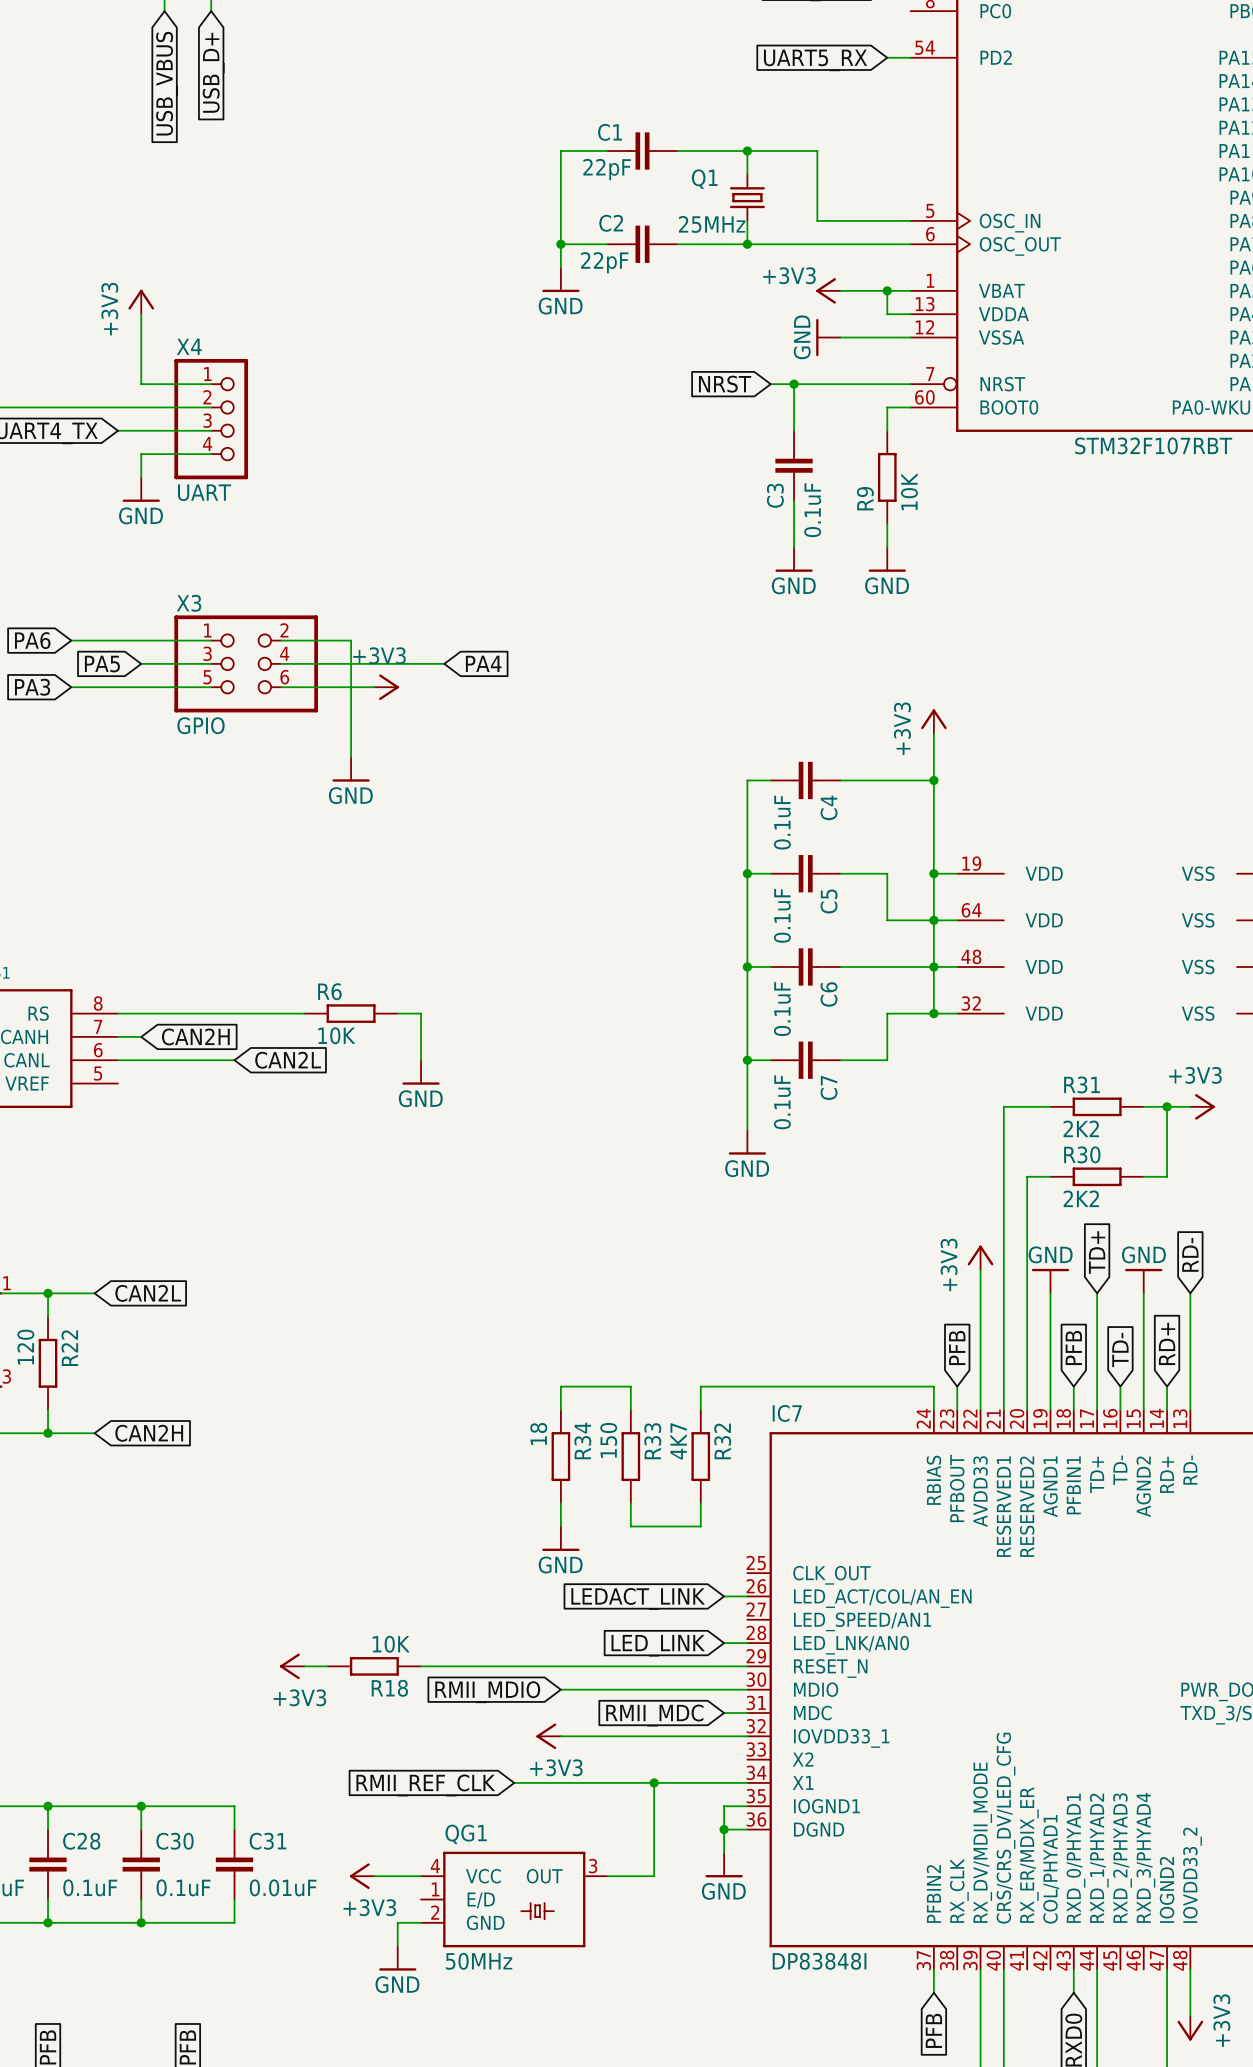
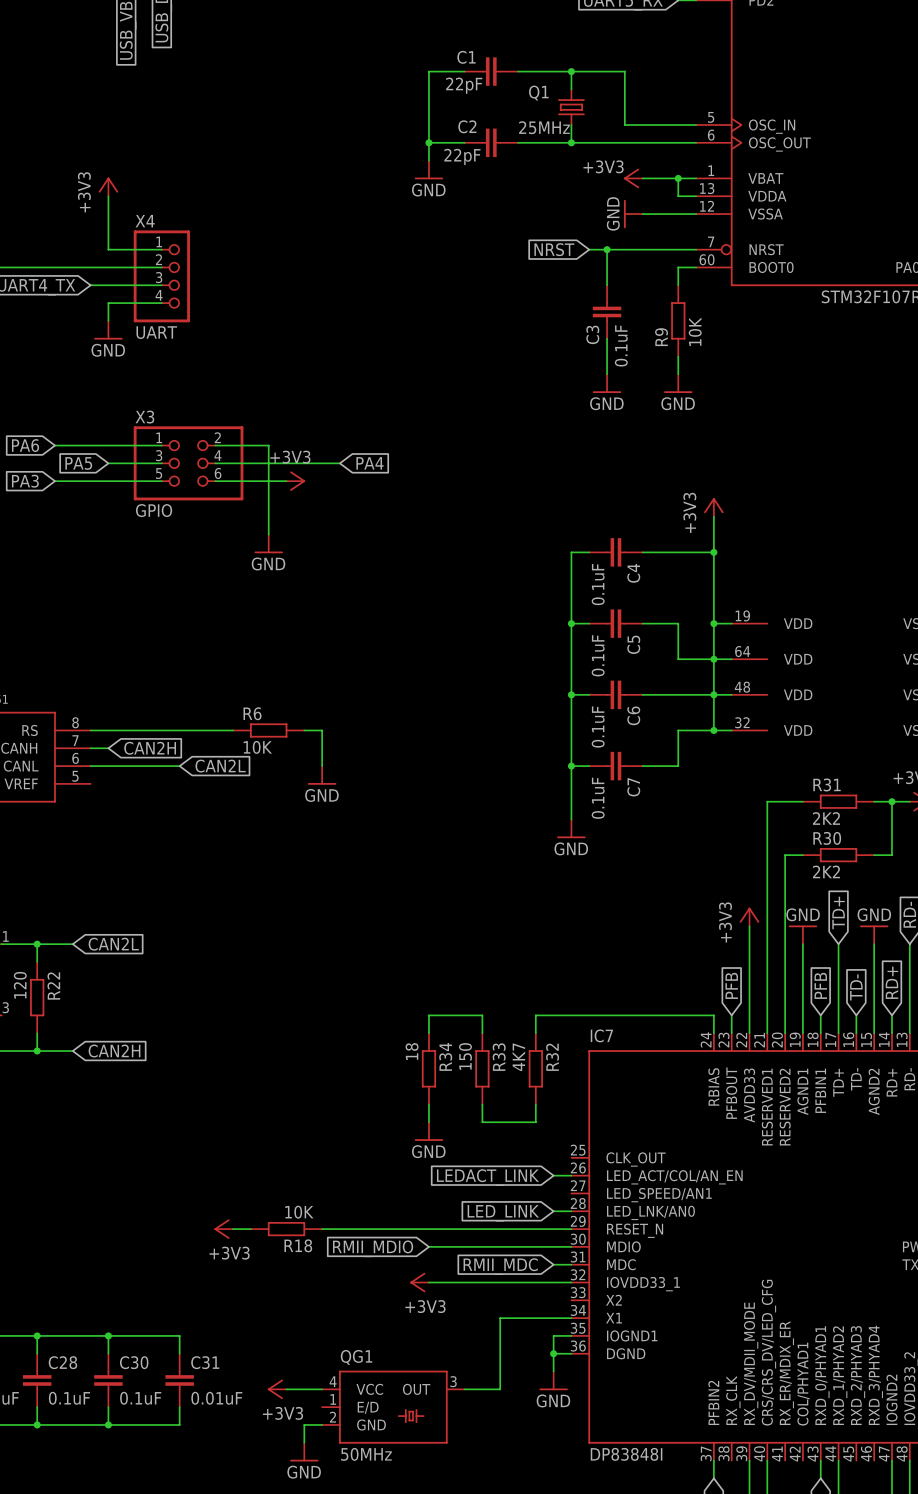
wire: (514, 1782) (654, 1782) -> none
junction: (654, 1782) -> none
global label: RMII_REF_CLK (425, 1785) -> none

